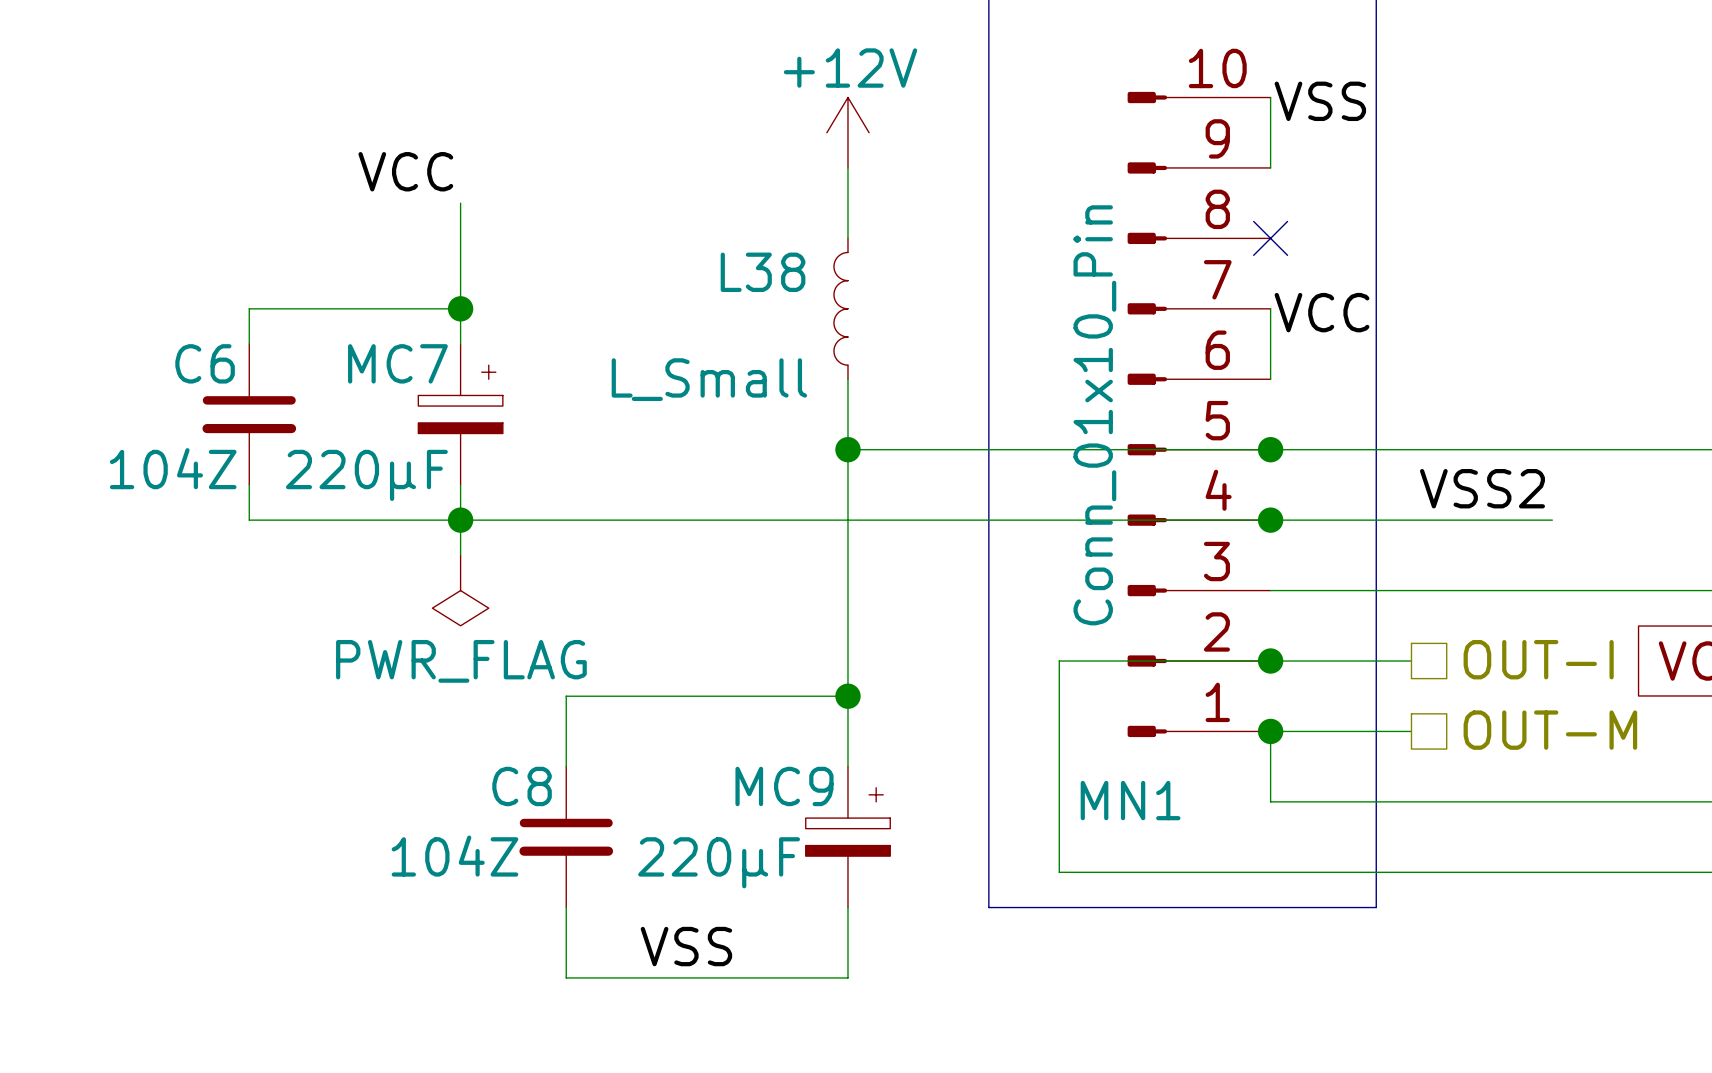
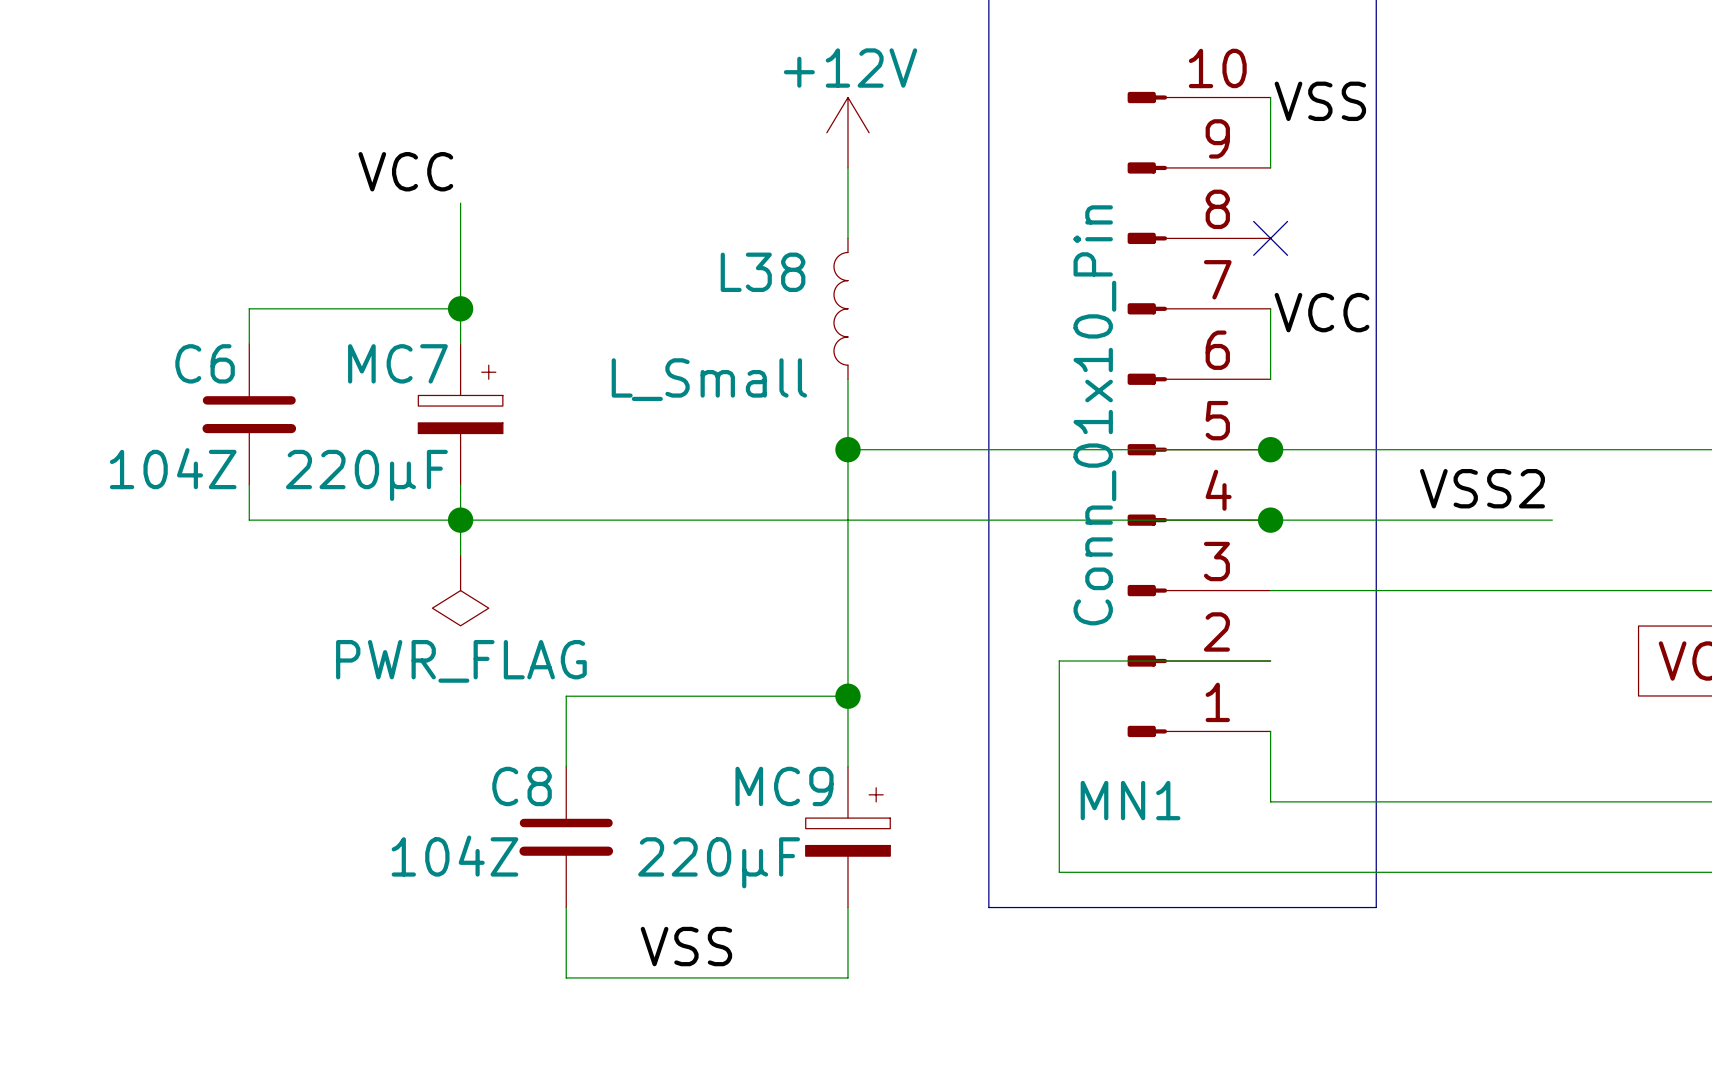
hierarchical label: OUT-I (1538, 659) -> none
wire: (1270, 661) (1411, 661) -> none
junction: (1270, 661) -> none
hierarchical label: OUT-M (1550, 730) -> none
wire: (1270, 731) (1411, 731) -> none
junction: (1270, 731) -> none

